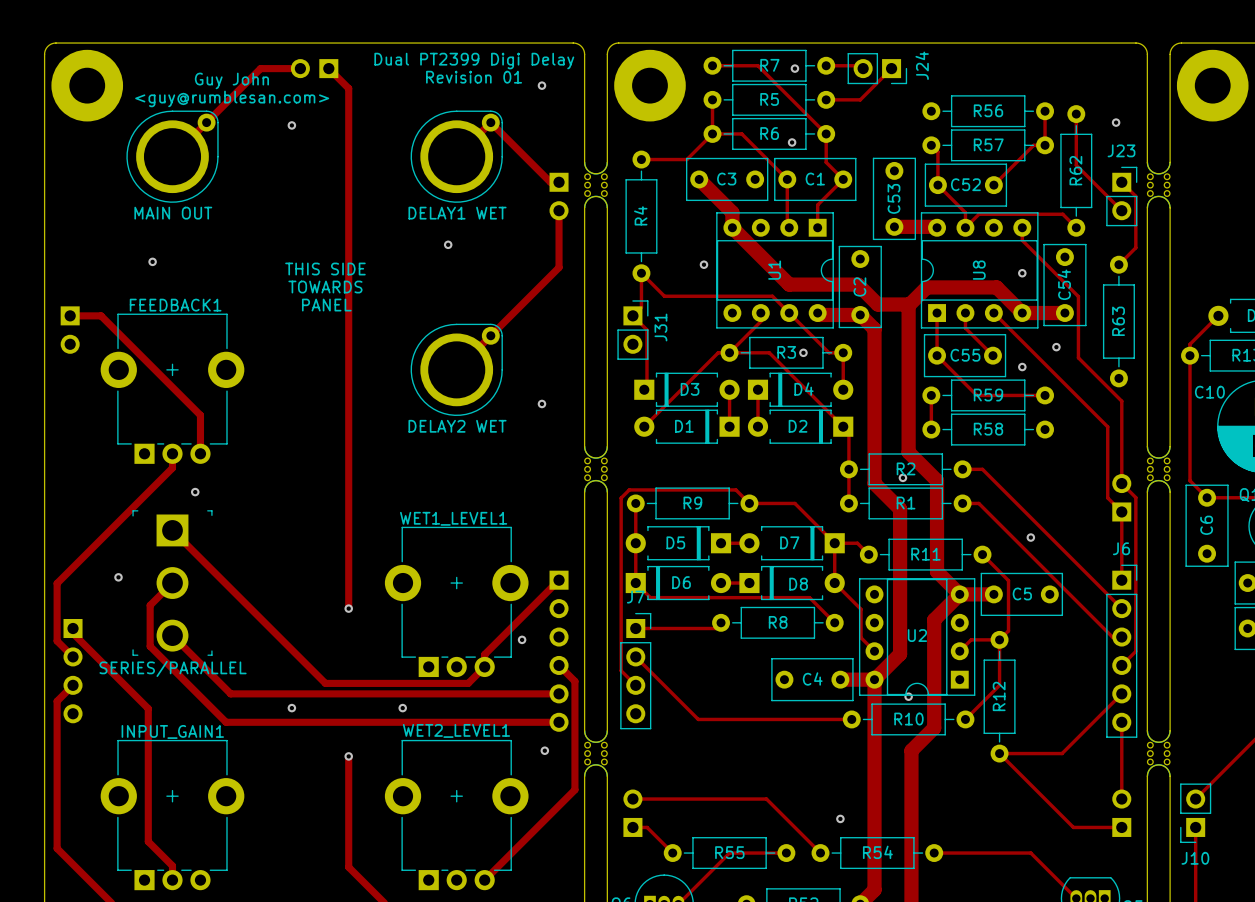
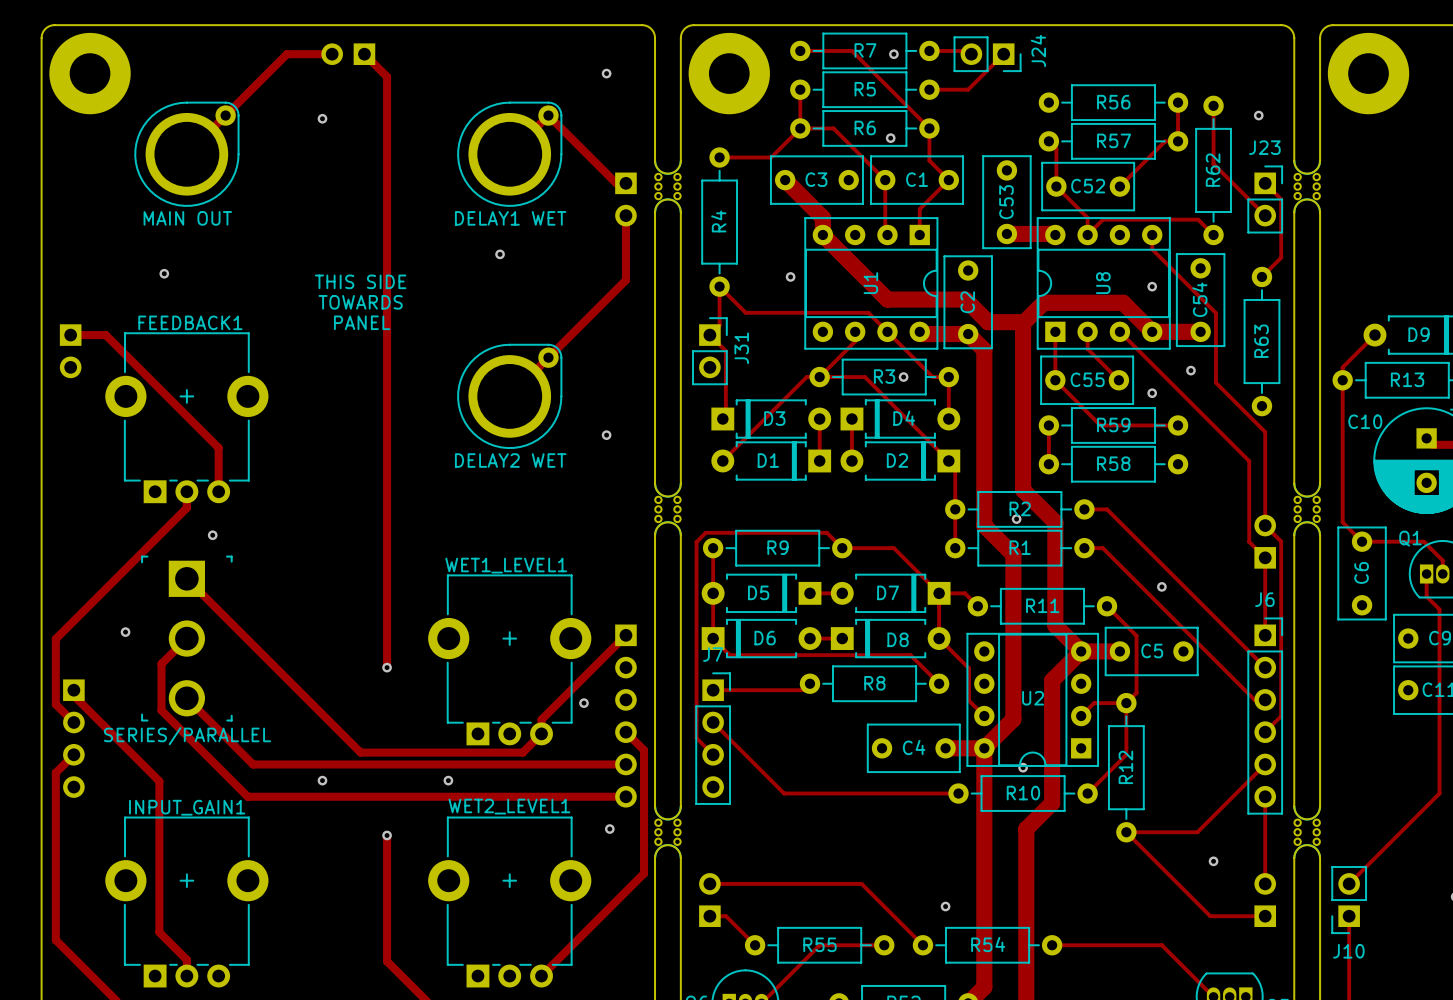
text: Dual PT2399 Digi Delay (474, 61) -> none
text: Revision 01 (474, 77) -> none
text: Guy John (231, 80) -> none
text: <guy@rumblesan.com> (232, 98) -> none
via: none -> (1213, 861)

